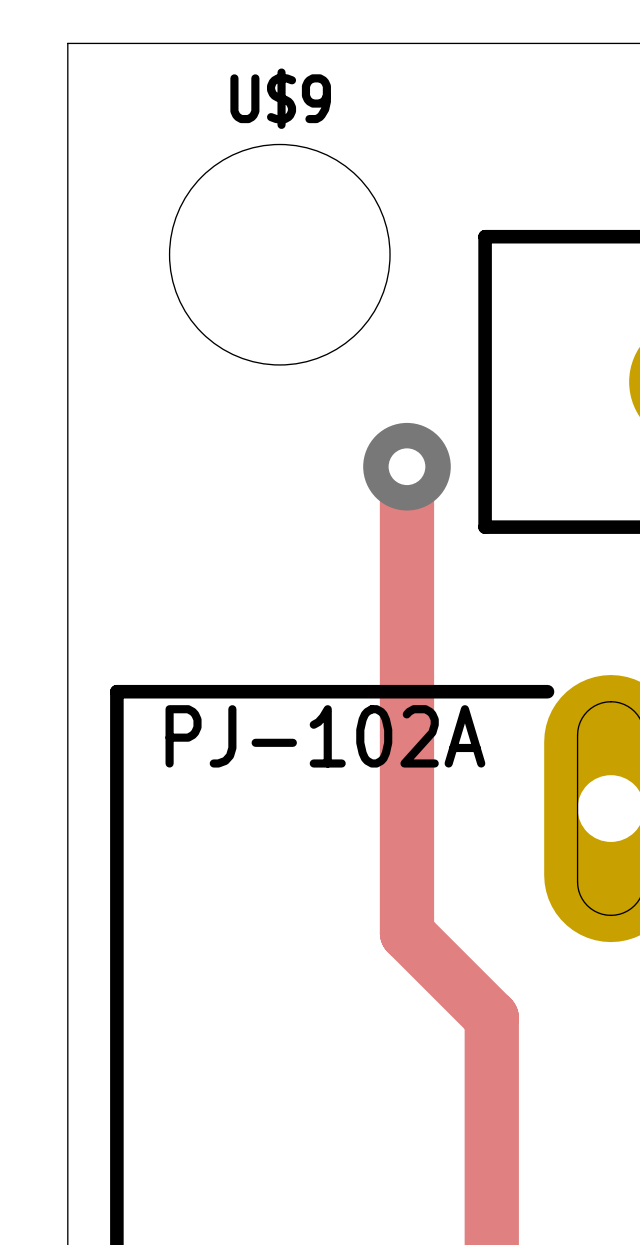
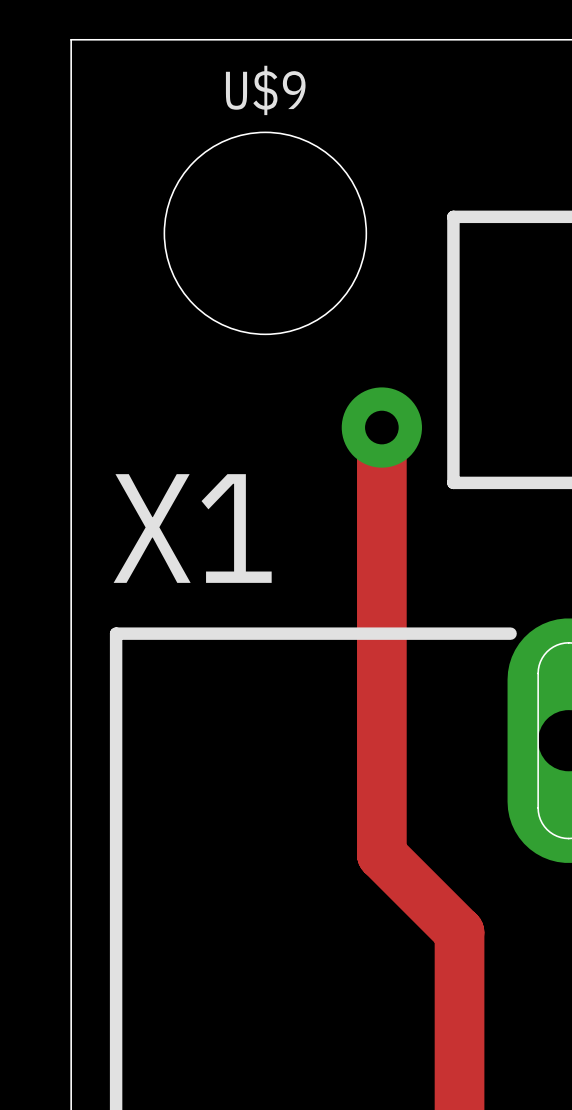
PJ-102A name: PJ-102A (325, 736) -> X1 (192, 528)

